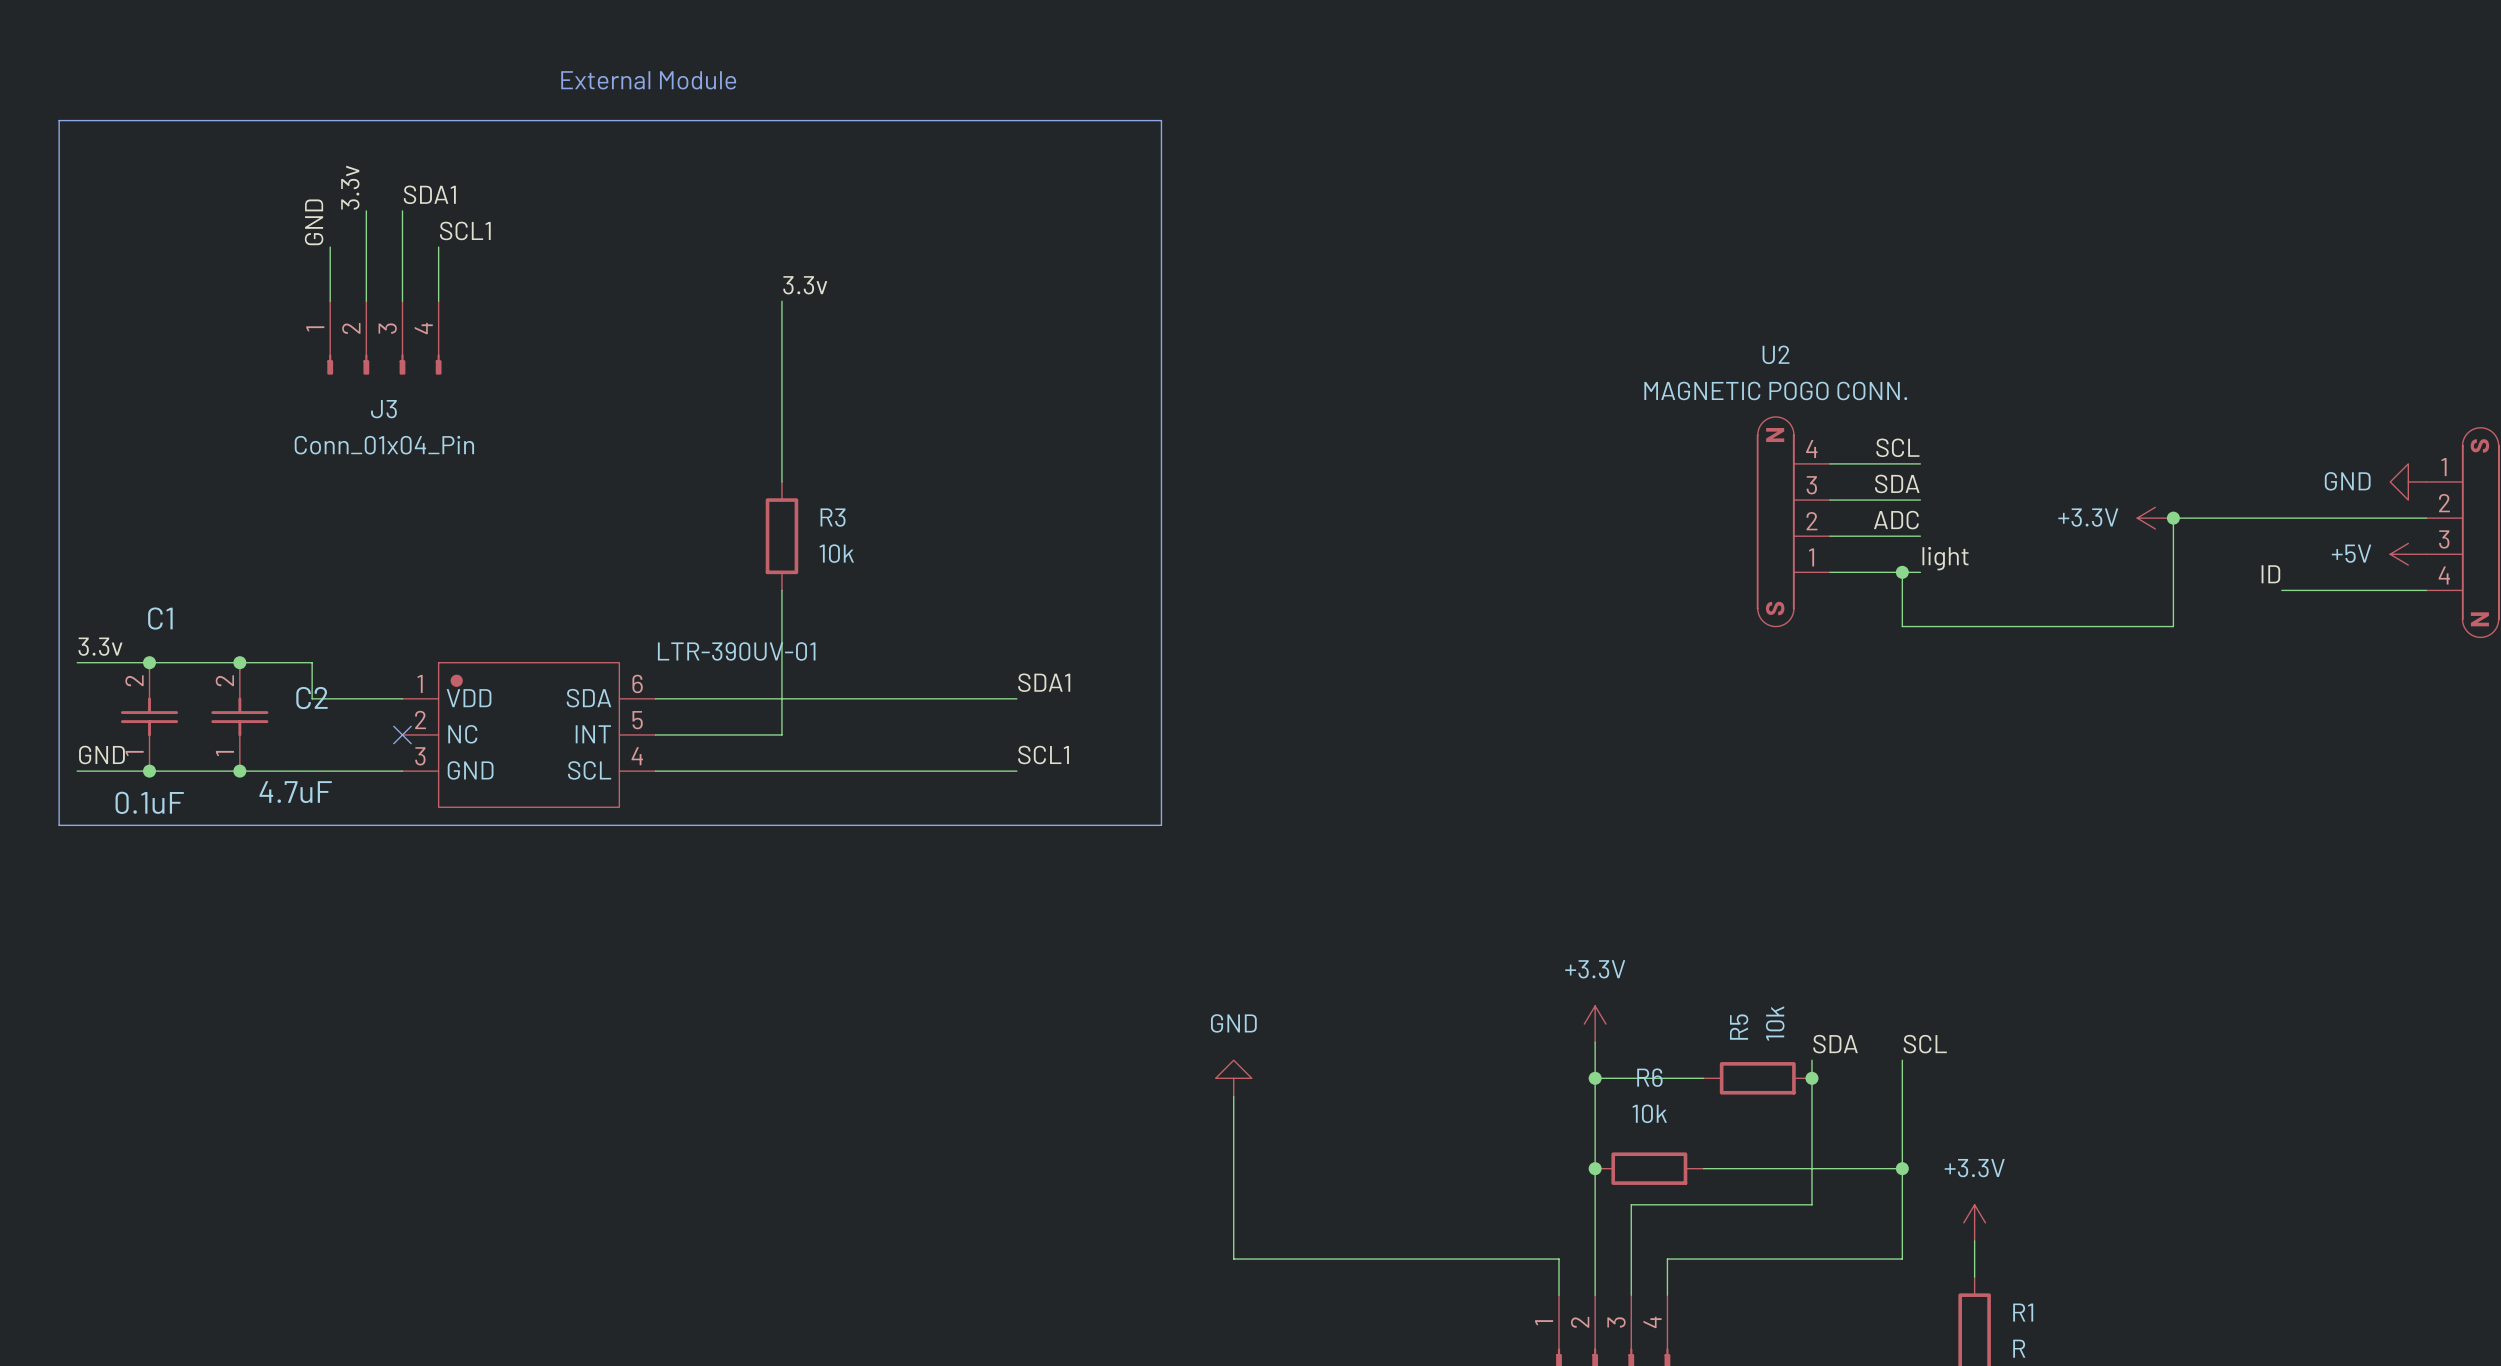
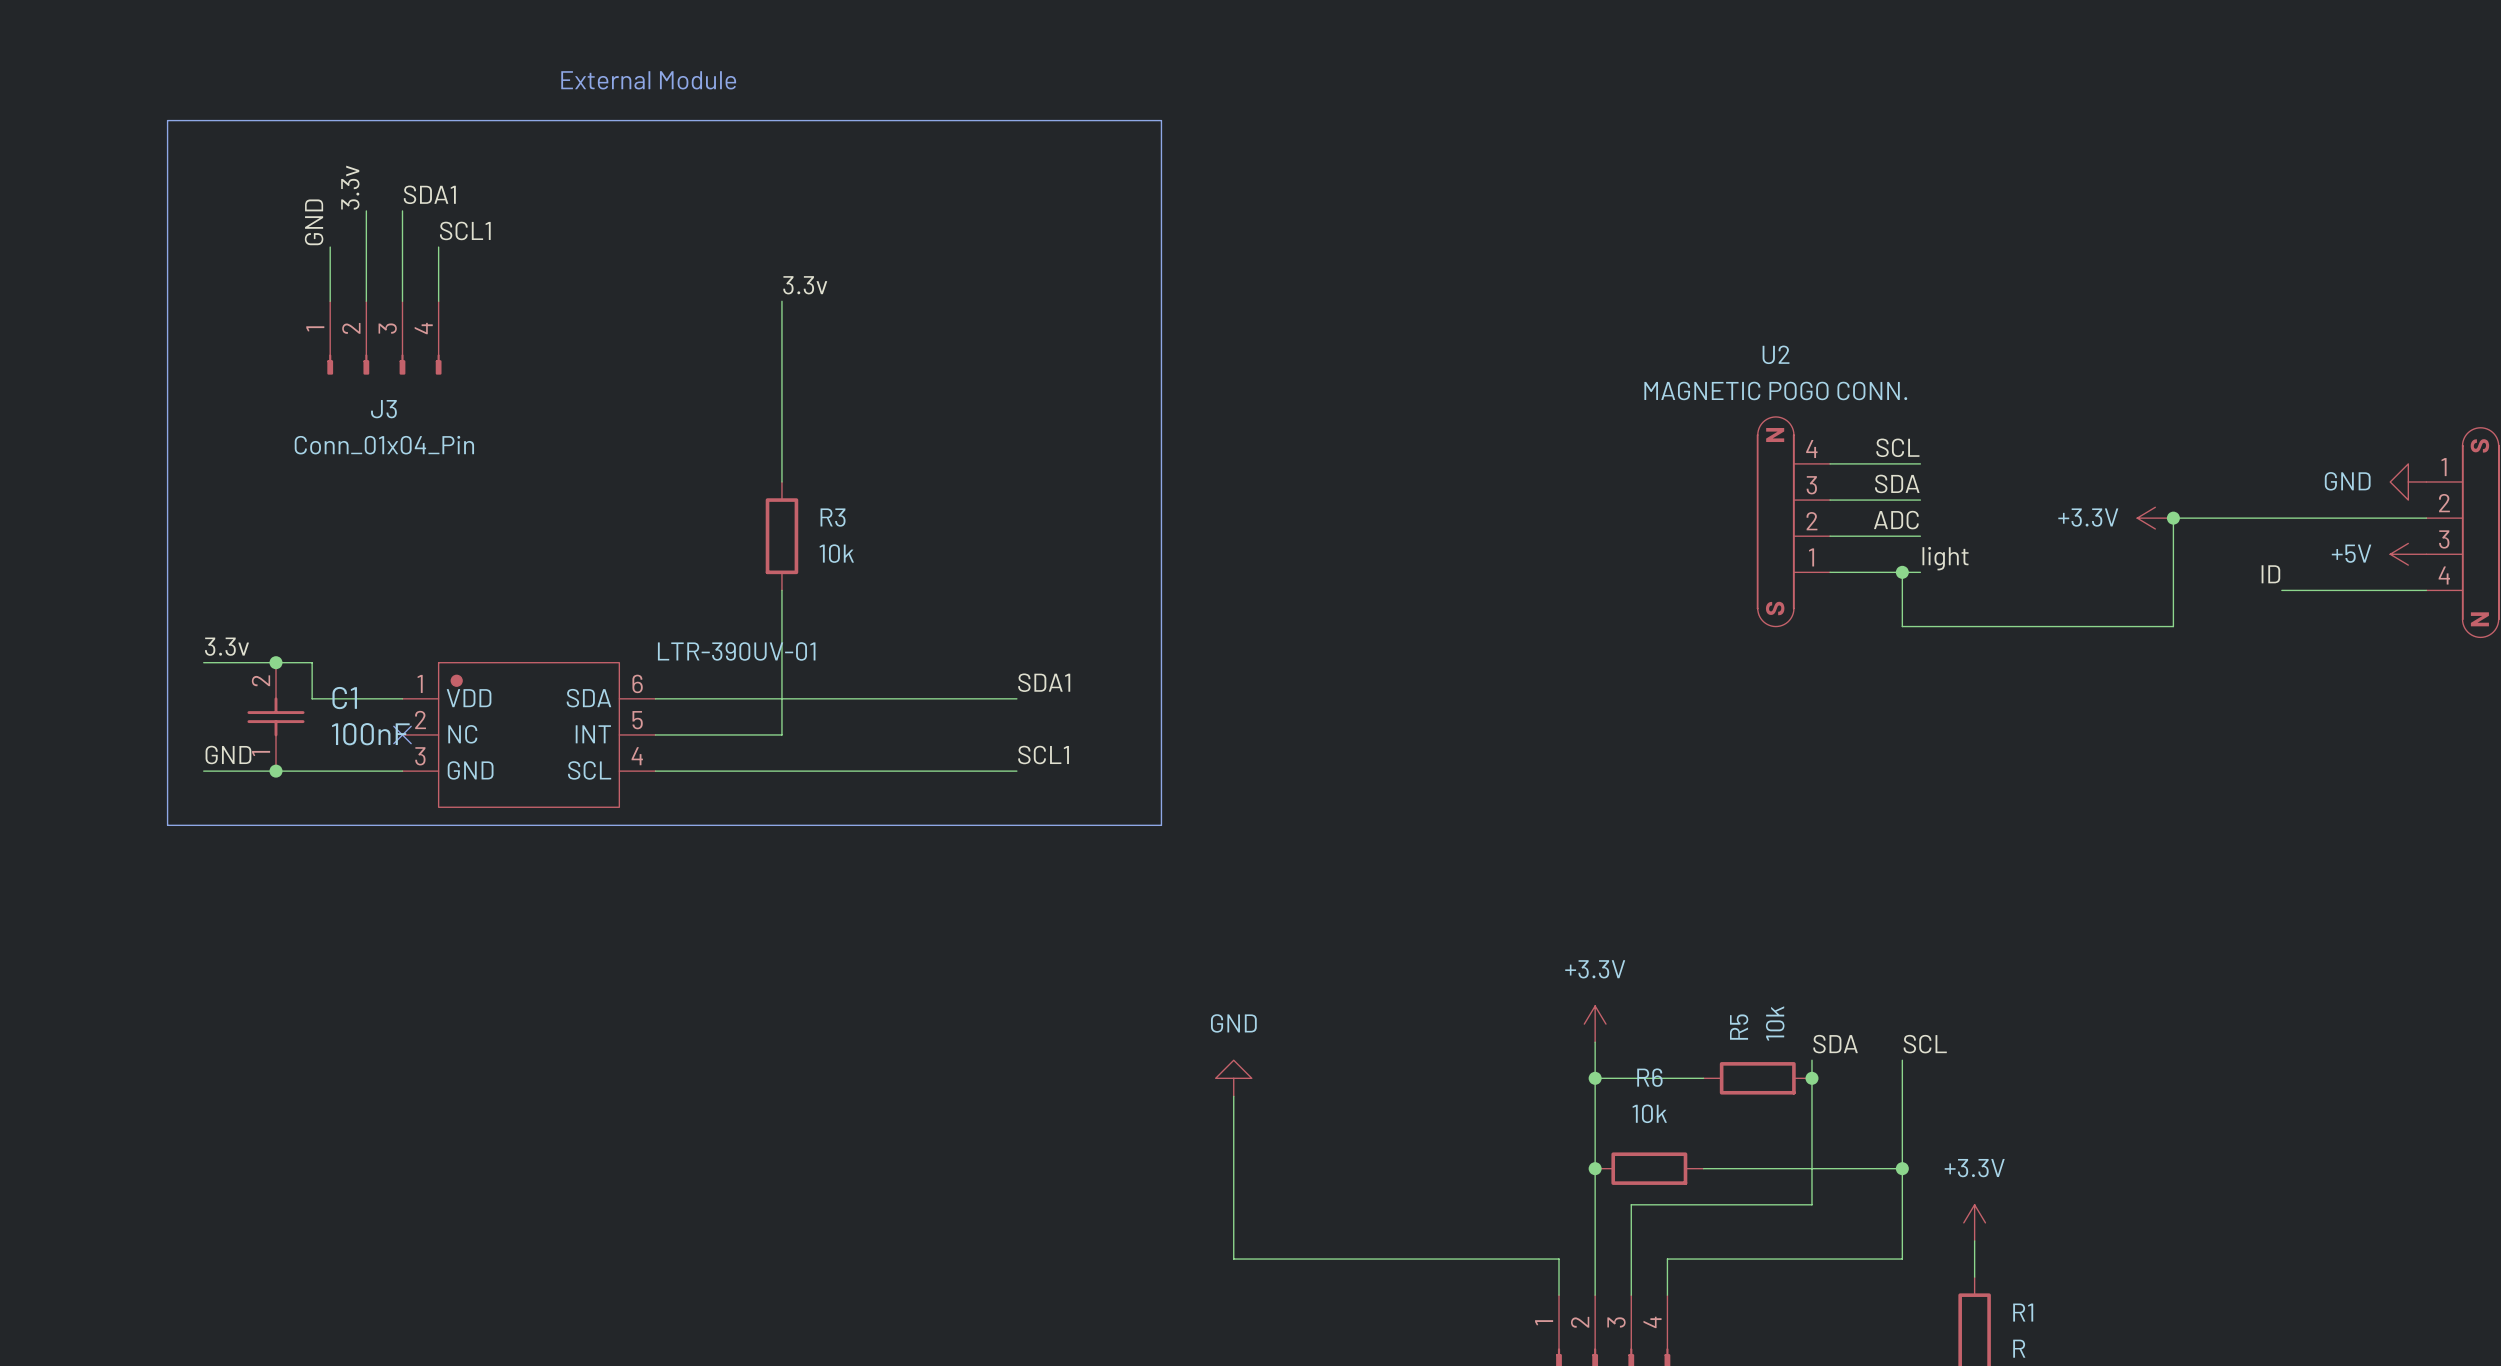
line: (167, 120) (59, 120) (59, 825) (167, 825) -> (167, 120) (167, 825)
C1 name position: C1 (160, 618) -> C1 (344, 698)
label position: 3.3v (100, 646) -> 3.3v (227, 646)
wire: (77, 662) (203, 662) -> none
junction: (149, 662) -> none
junction position: (239, 662) -> (275, 662)
C1 position: (149, 716) -> (275, 716)
C2: 4.7uF (239, 716) -> none
label position: GND (101, 754) -> GND (228, 754)
wire: (77, 771) (203, 771) -> none
junction: (149, 771) -> none
junction position: (239, 771) -> (275, 771)
C1 value: 0.1uF (149, 802) -> 100nF (370, 734)

